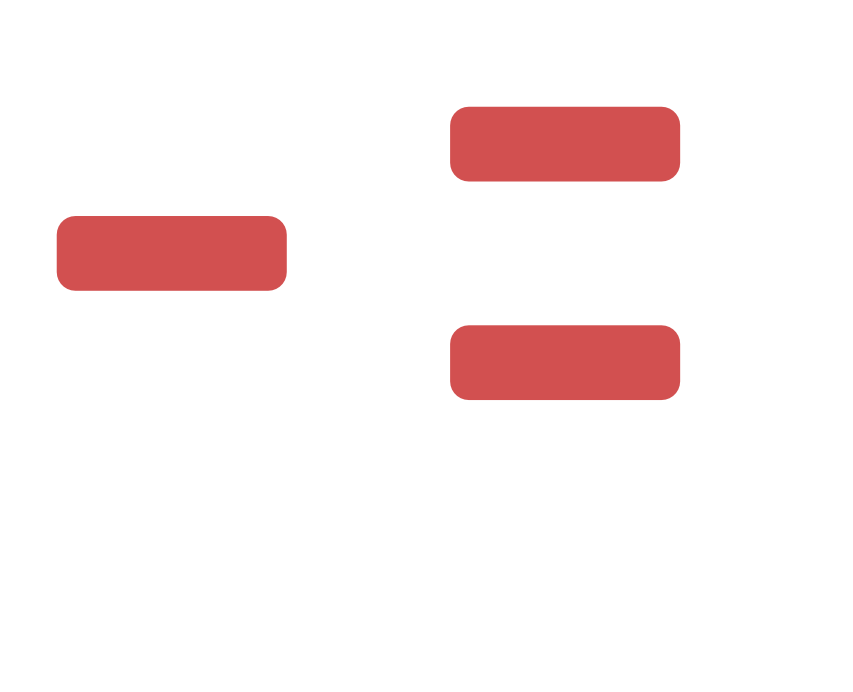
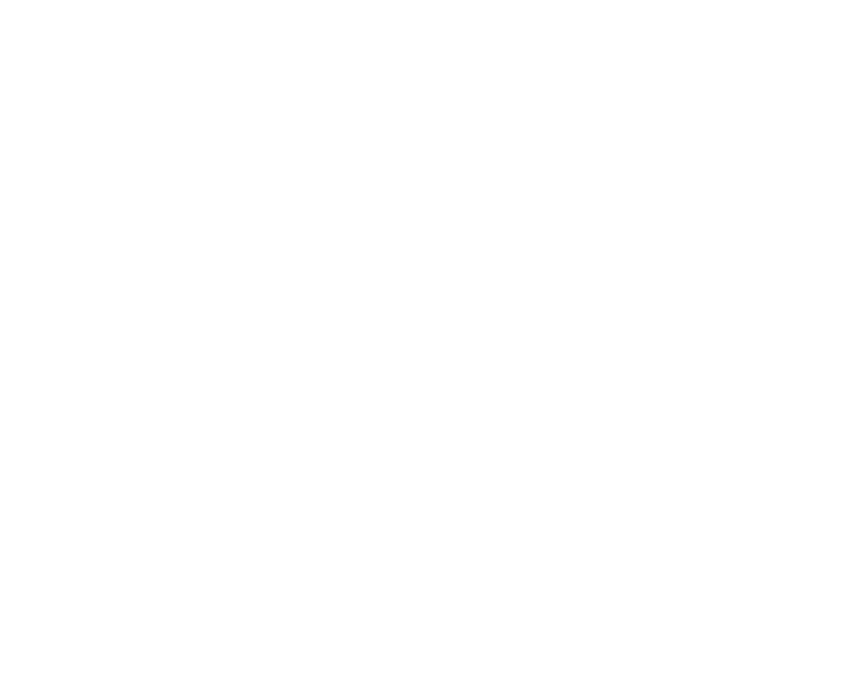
part: (368, 253) -> none

